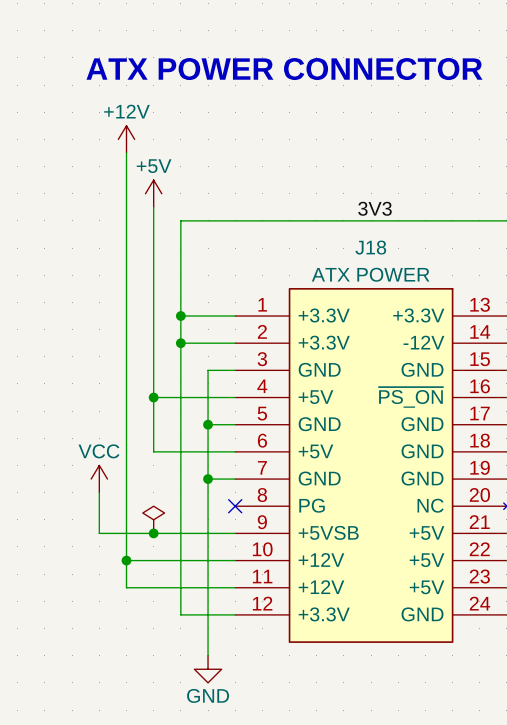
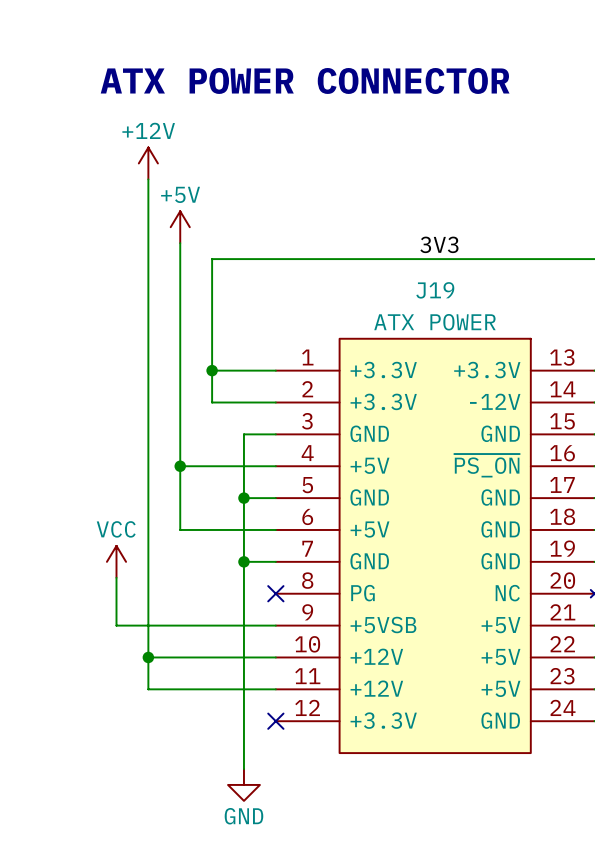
J18 name: J18 (370, 247) -> J19 (435, 290)
wire: (180, 343) (180, 614) (235, 614) -> none
junction: (180, 343) -> none
power symbol: (153, 519) -> none
junction: (153, 533) -> none
no-connect mark: none -> (275, 721)

